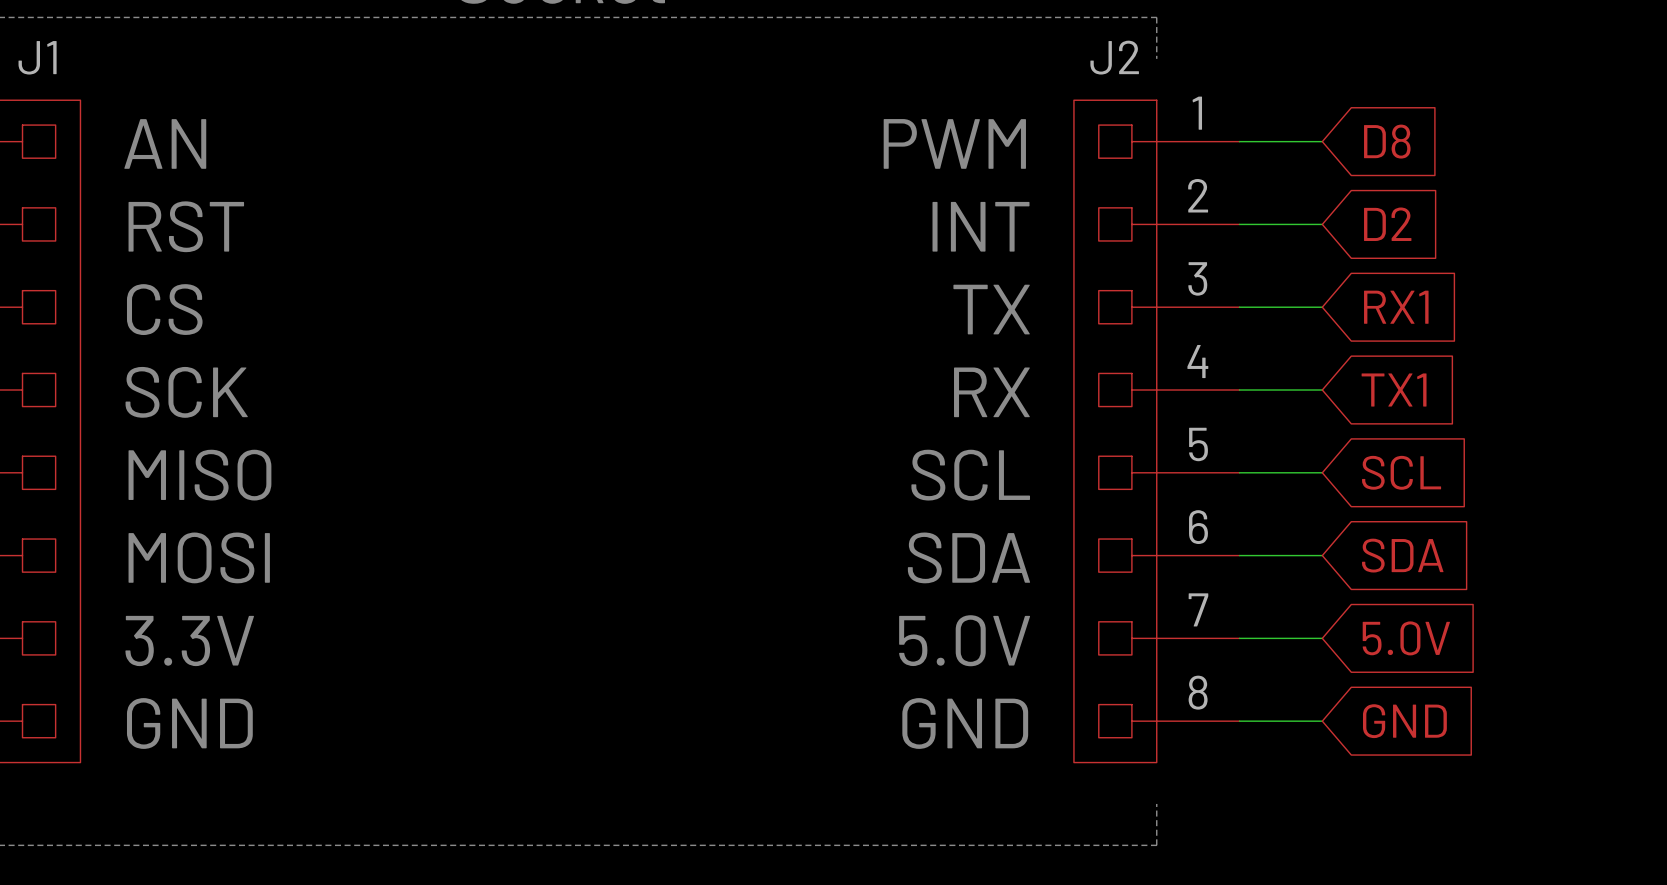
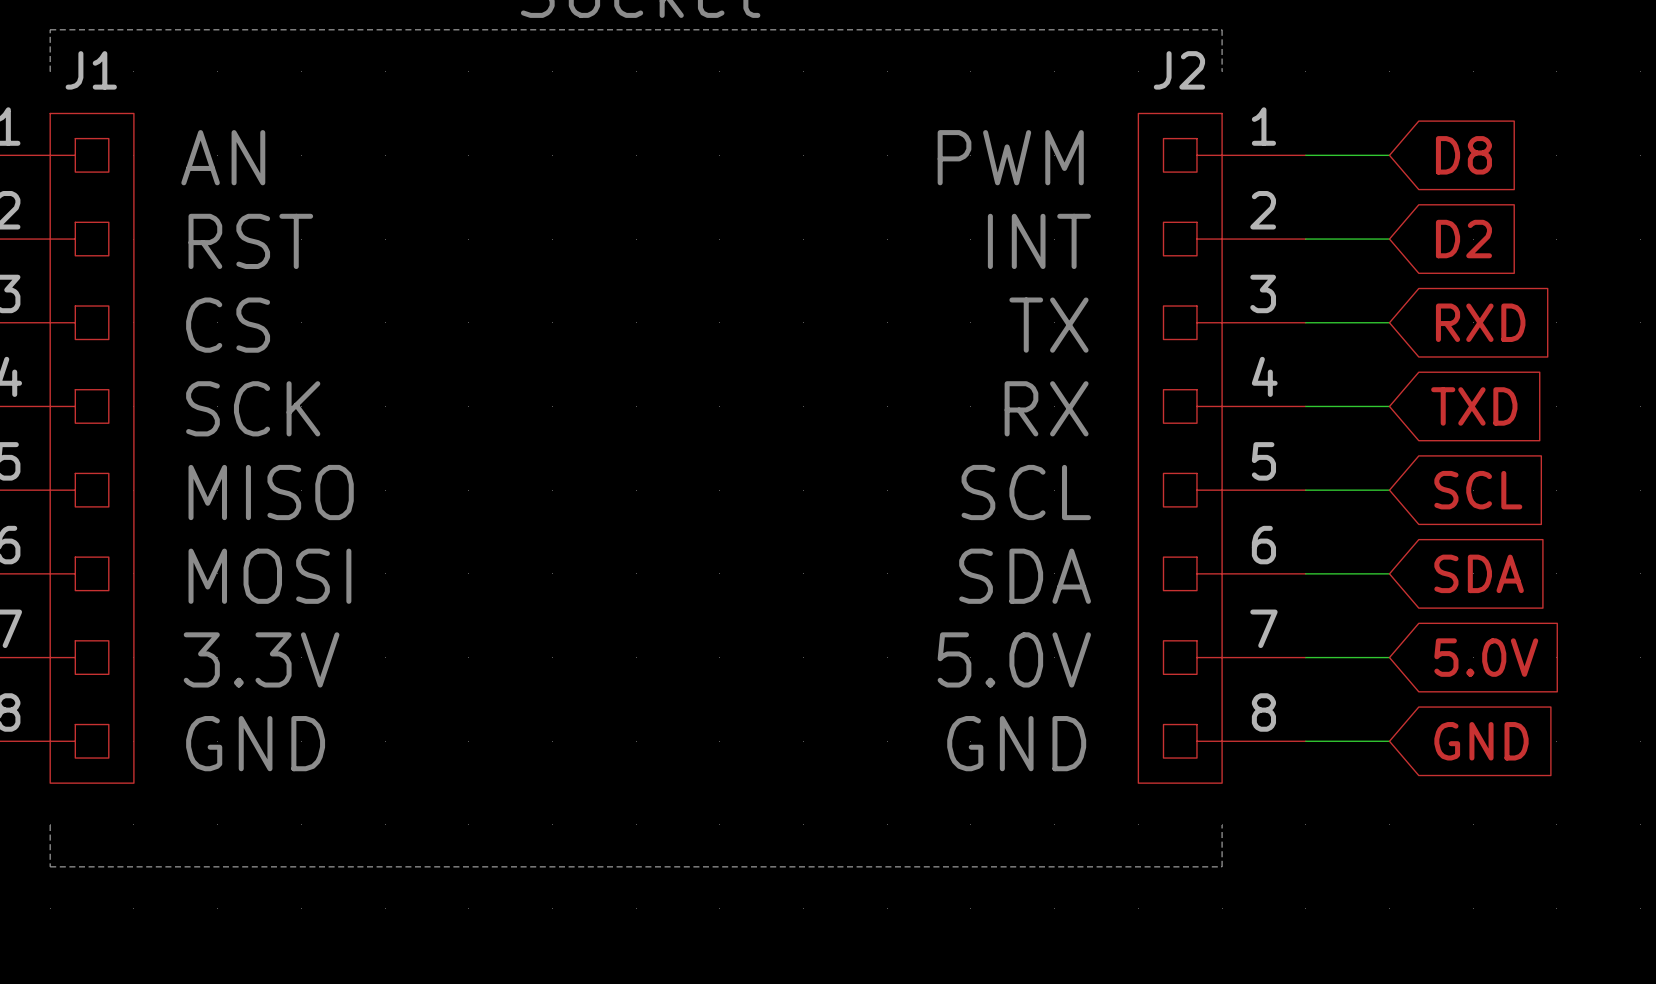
global label: RX1 (1396, 307) -> RXD (1480, 322)
global label: TX1 (1394, 390) -> TXD (1474, 406)

